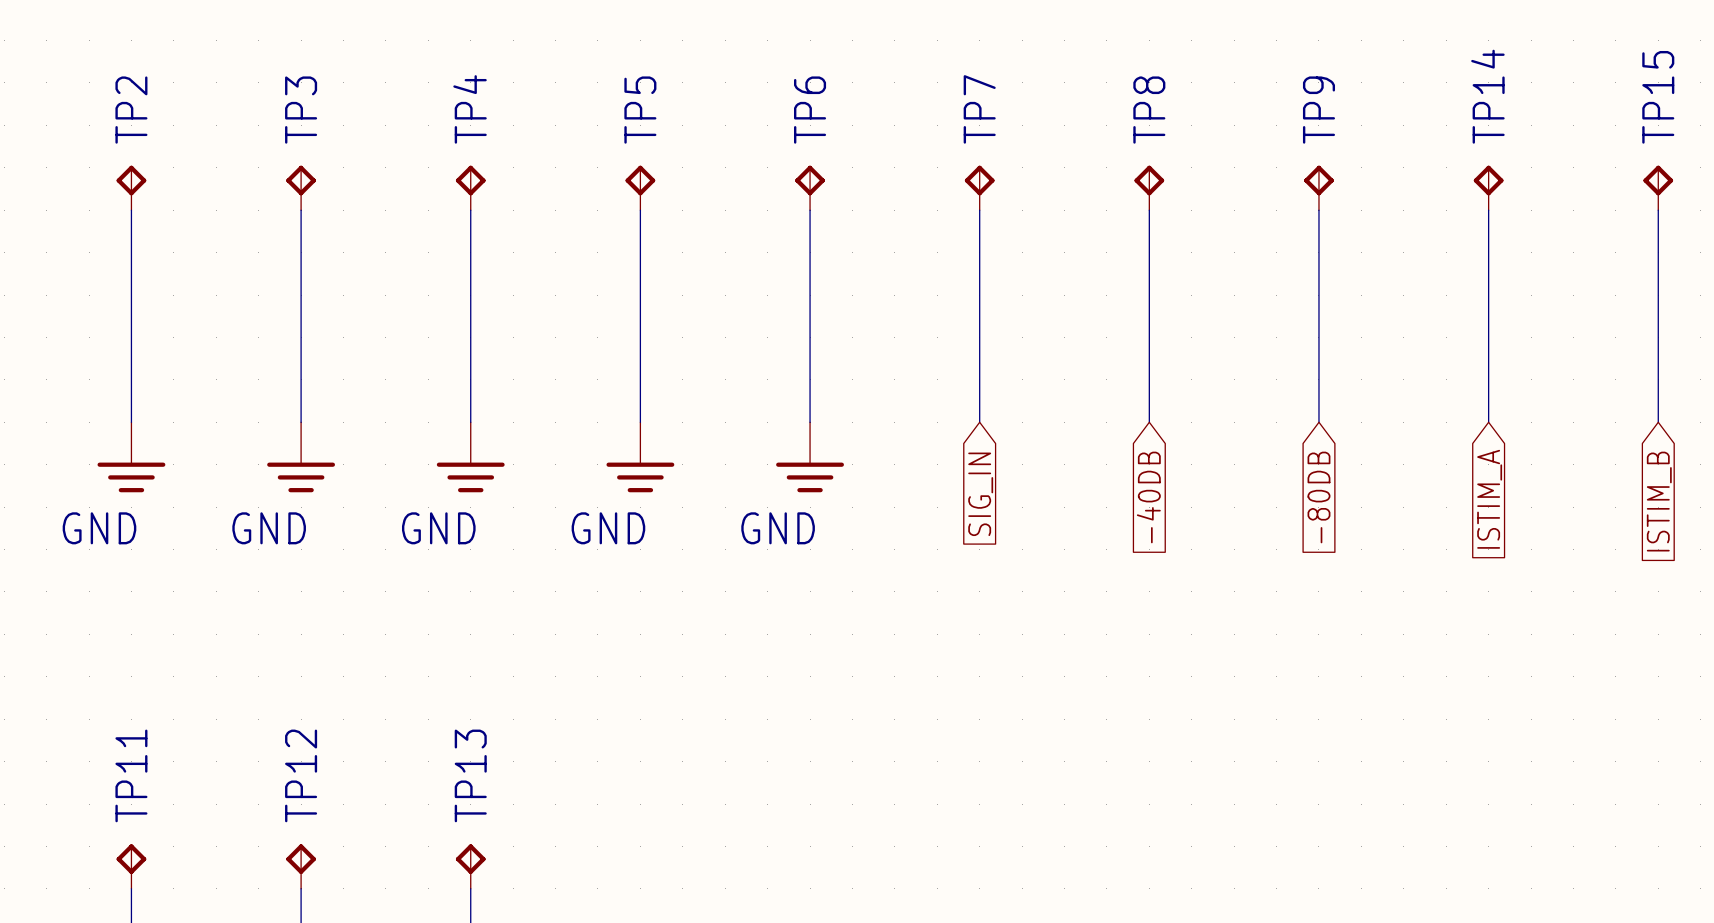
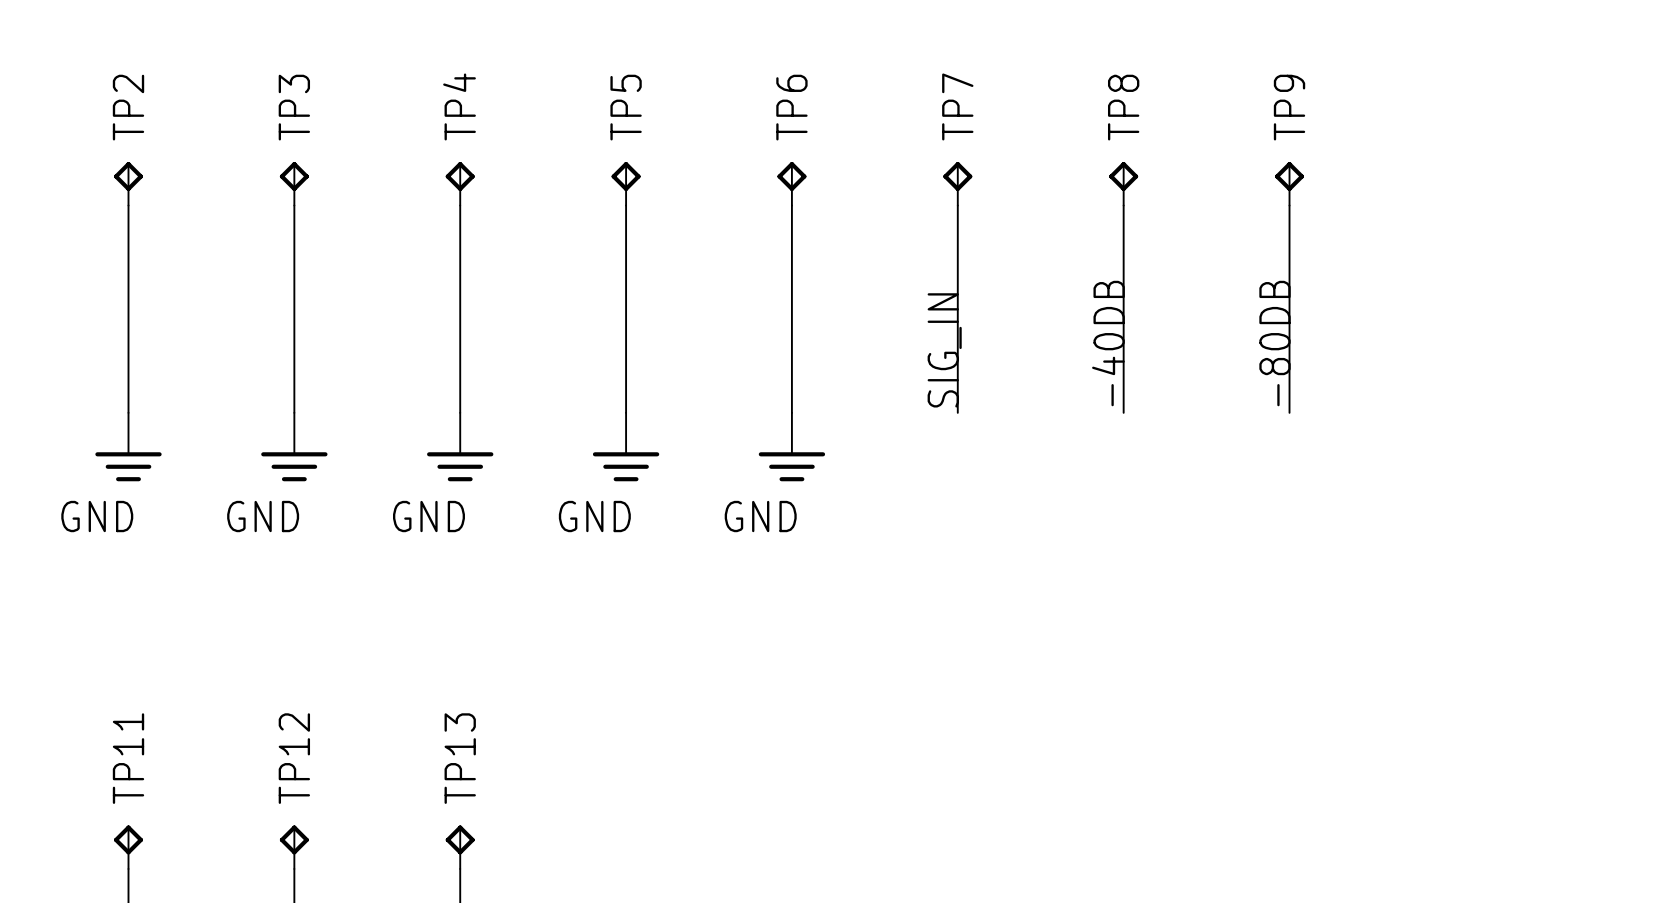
TP14: (1488, 187) -> none
TP15: (1658, 187) -> none
wire: (1488, 210) (1488, 422) -> none
wire: (1658, 210) (1658, 422) -> none
label: none -> -40DB (1108, 343)
label: none -> -80DB (1275, 343)
label: none -> SIG_IN (944, 350)
global label: SIG_IN (980, 494) -> none
global label: -40DB (1148, 497) -> none
global label: -80DB (1318, 497) -> none
global label: ISTIM_A (1489, 499) -> none
global label: ISTIM_B (1659, 501) -> none

